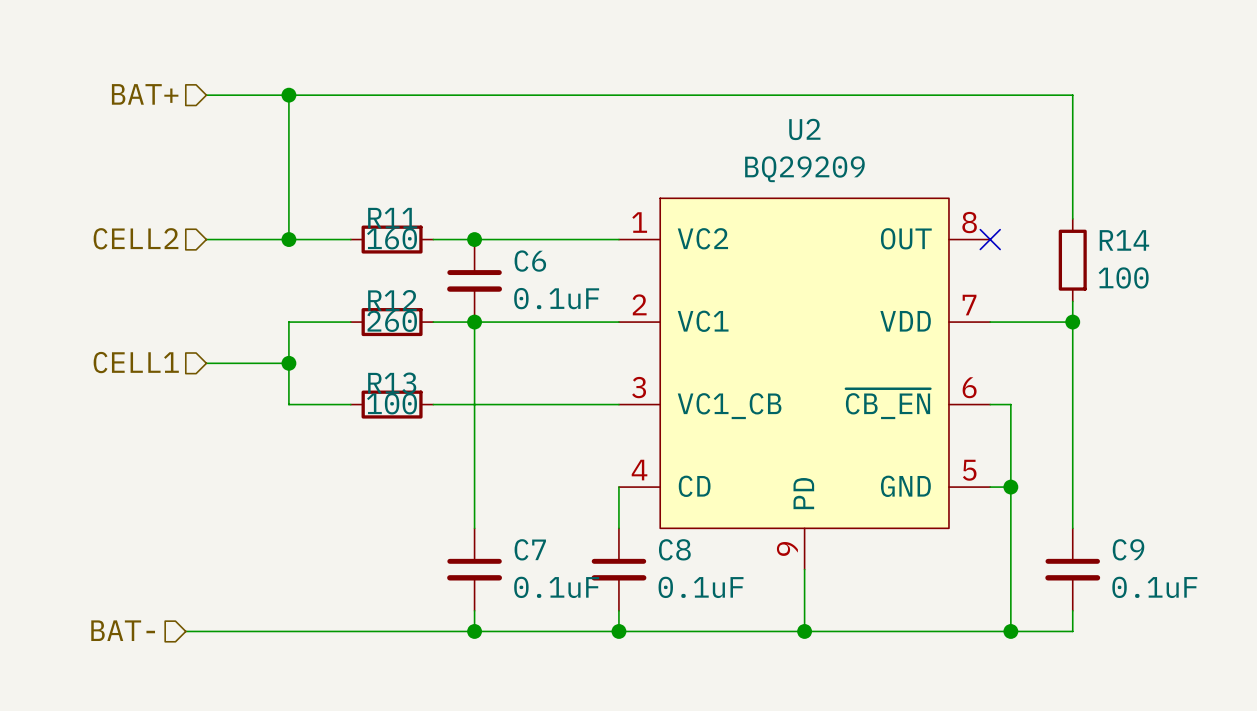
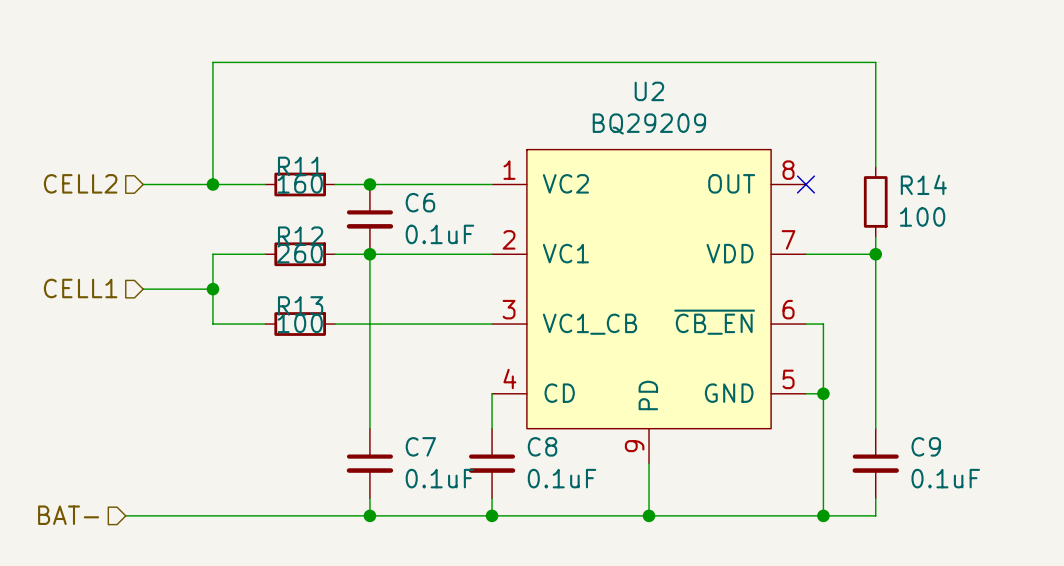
hierarchical label: BAT+ (145, 94) -> none
wire: (206, 95) (288, 95) -> none
junction: (288, 95) -> none

